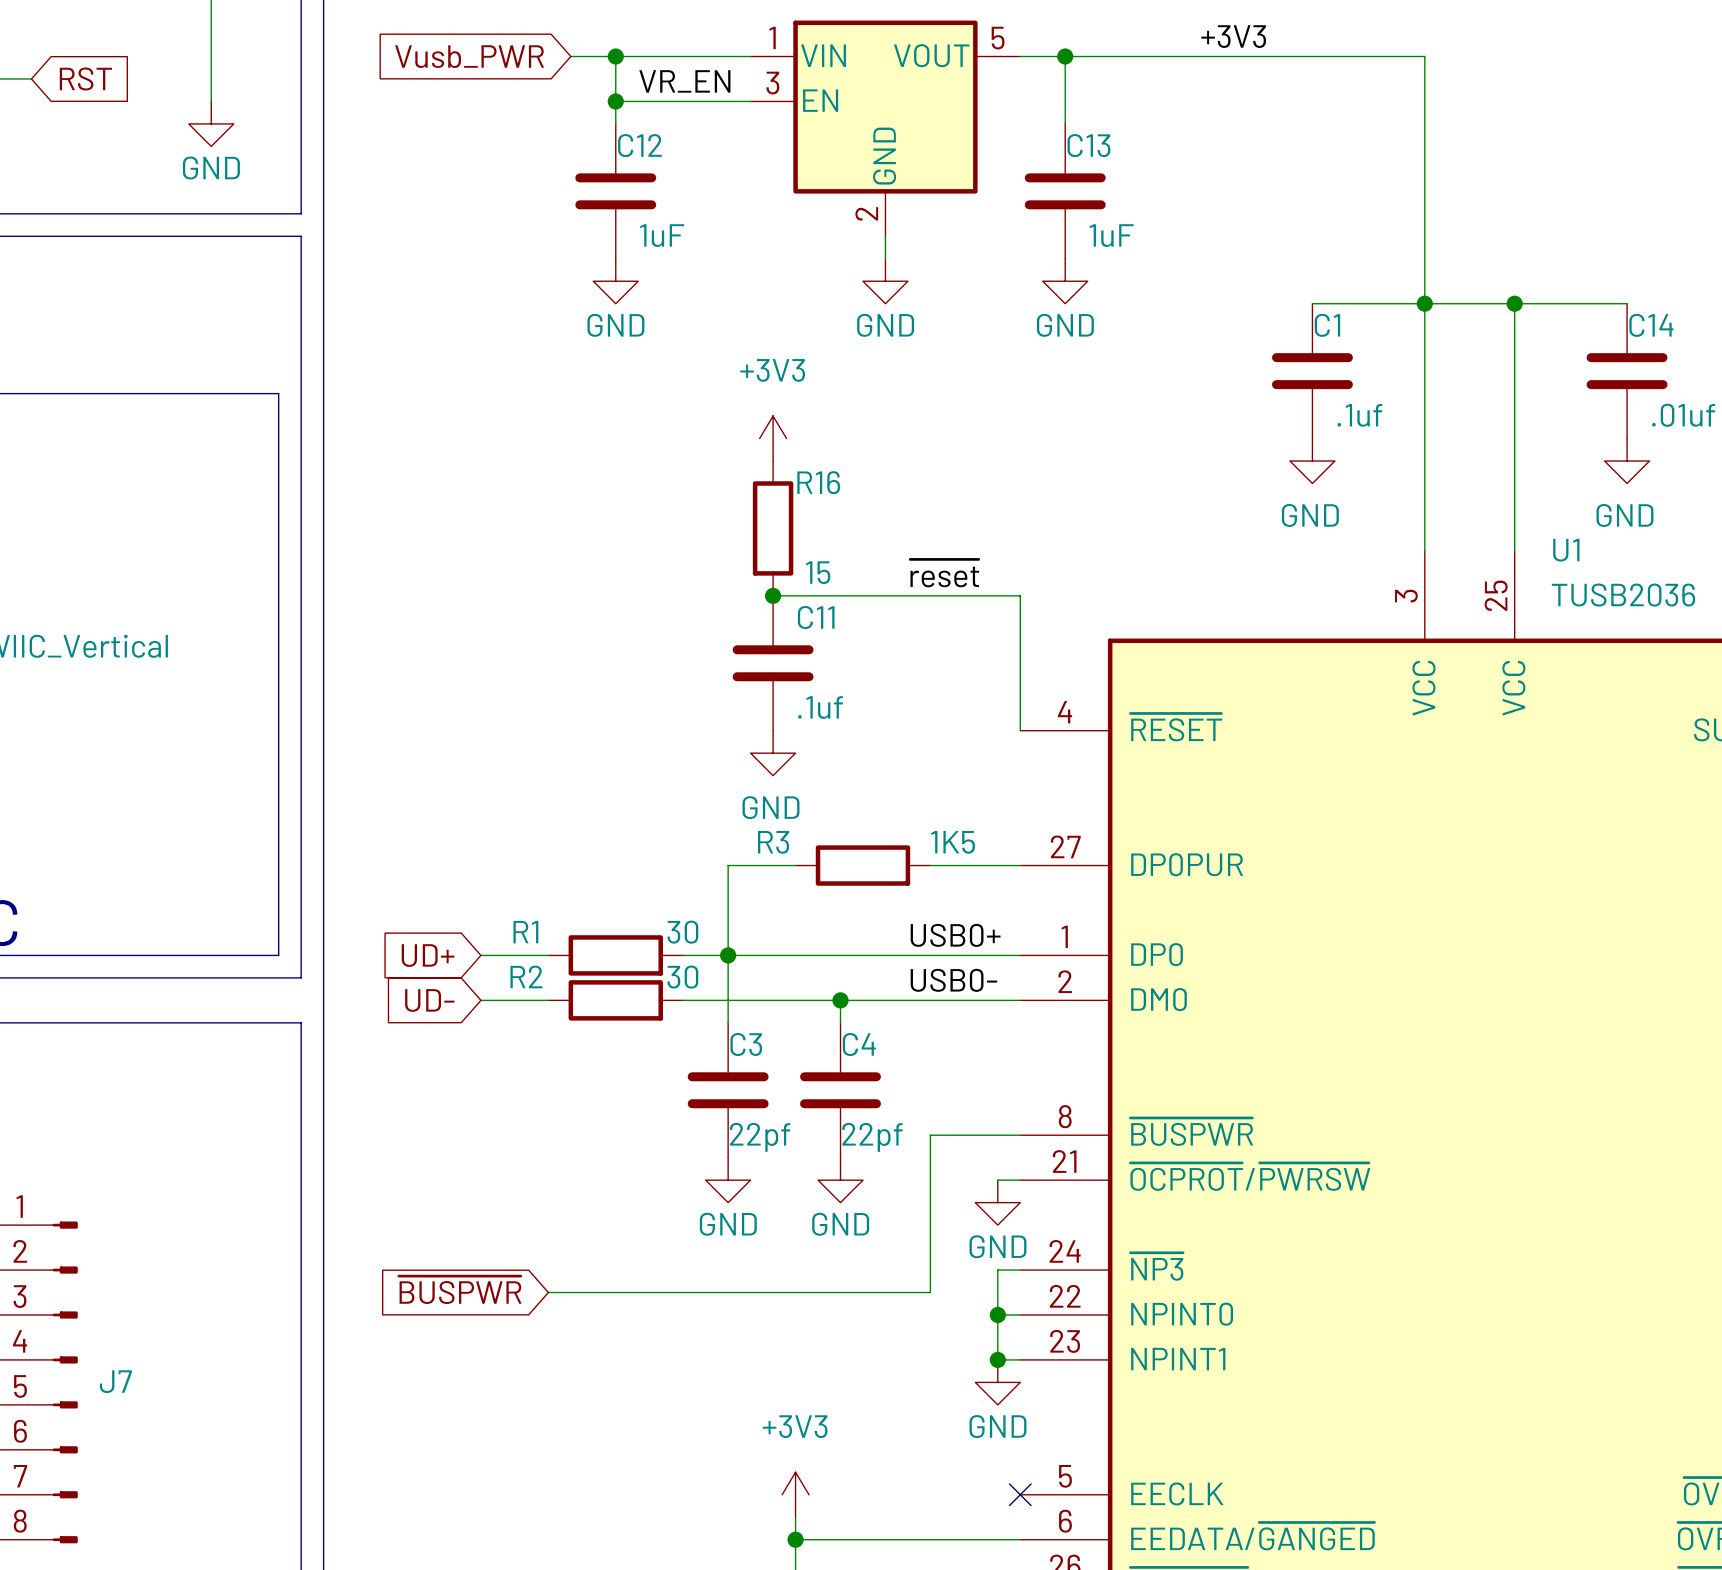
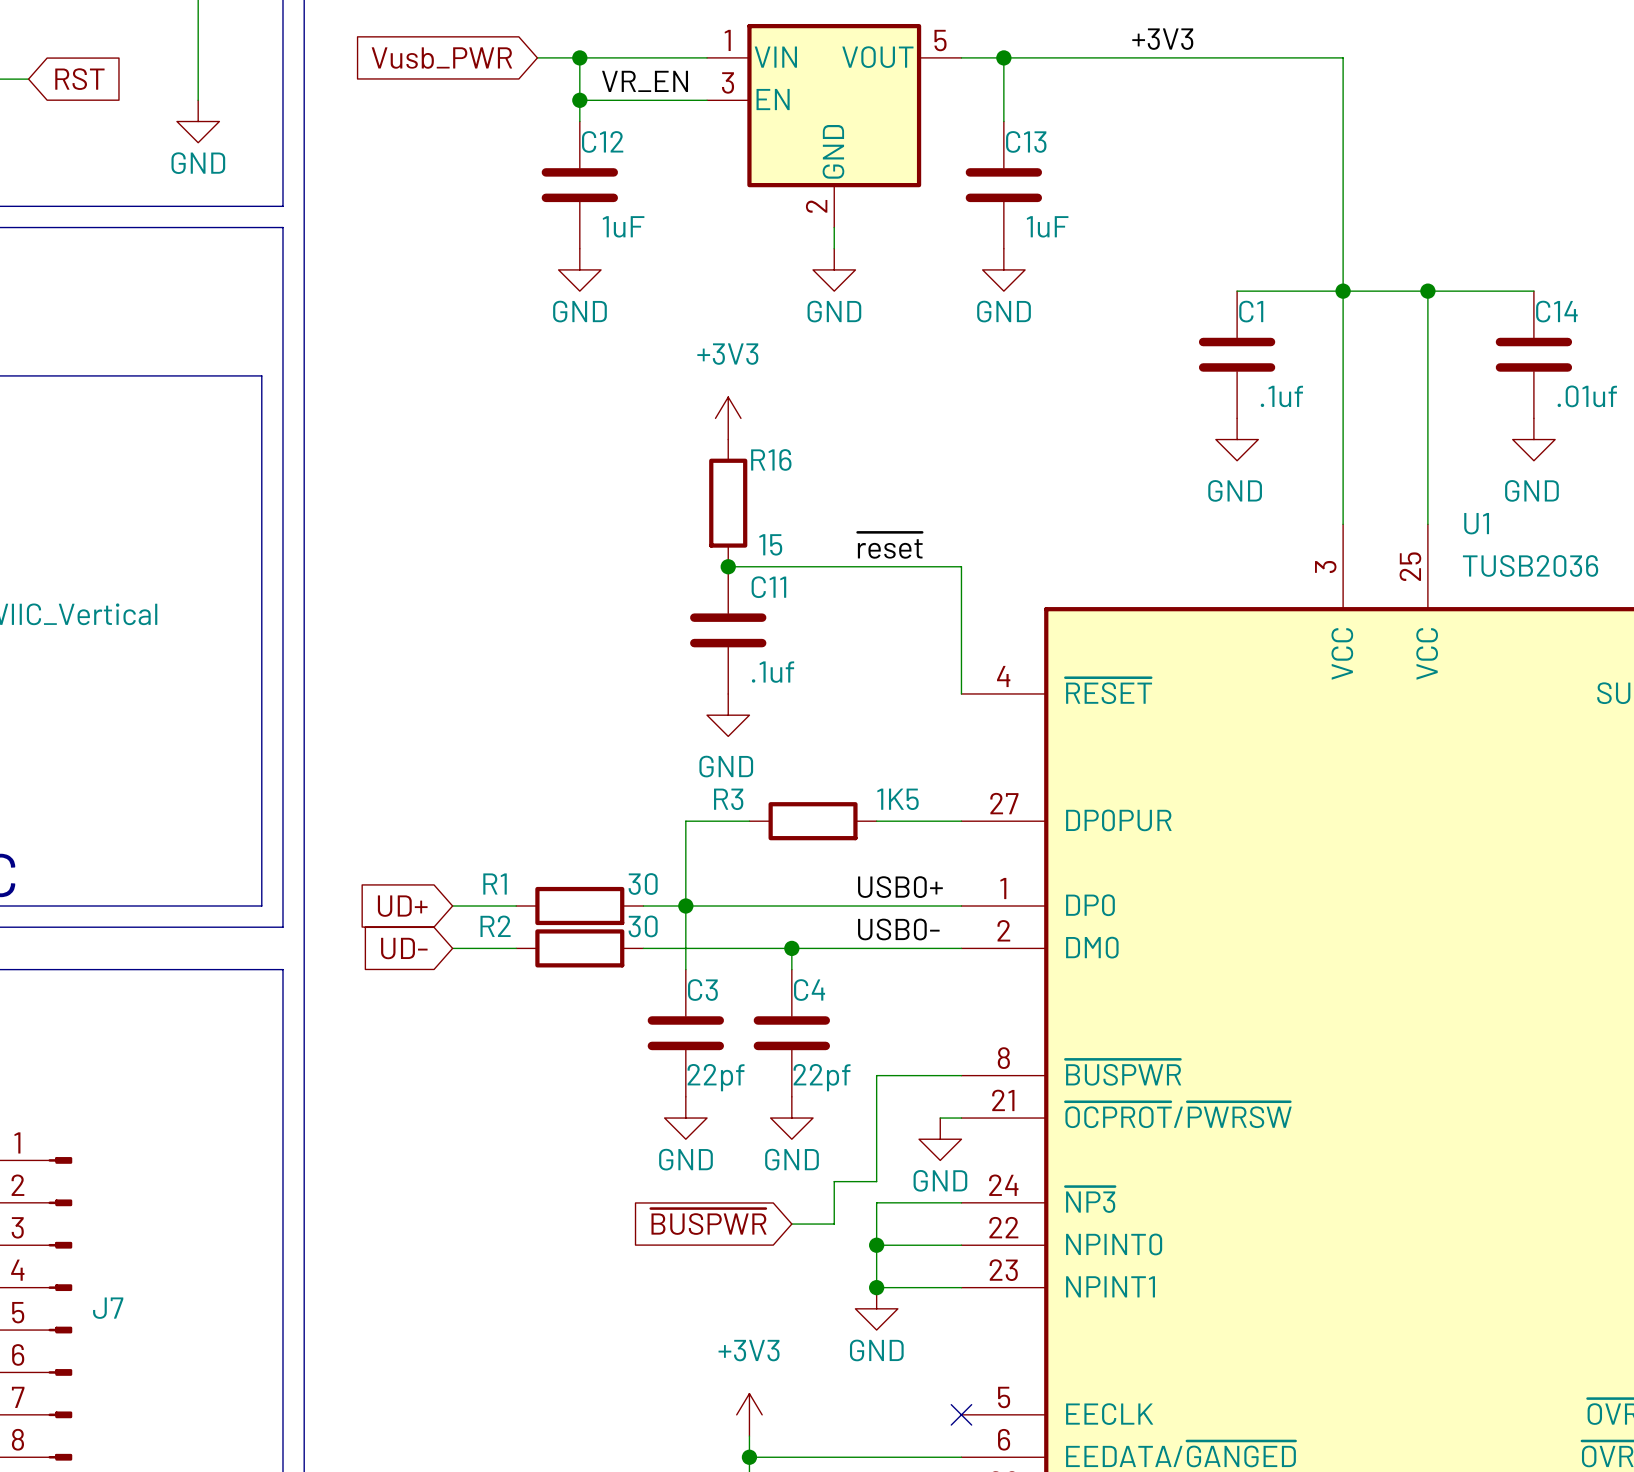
wire: (930, 1247) (930, 1270) -> (940, 1202) (876, 1202)
wire: (997, 1270) (997, 1359) -> (876, 1224) (876, 1287) (940, 1287)
global label position: ~{BUSPWR} (460, 1290) -> ~{BUSPWR} (708, 1221)
wire: (548, 1292) (840, 1292) -> none
wire: (885, 1292) (930, 1292) -> (834, 1224) (834, 1181) (876, 1181)
wire: none -> (876, 1245) (940, 1245)
junction: none -> (876, 1245)
junction: (997, 1314) -> none
junction: none -> (876, 1287)
junction: (997, 1359) -> none
power symbol position: GND (997, 1382) -> GND (876, 1308)

